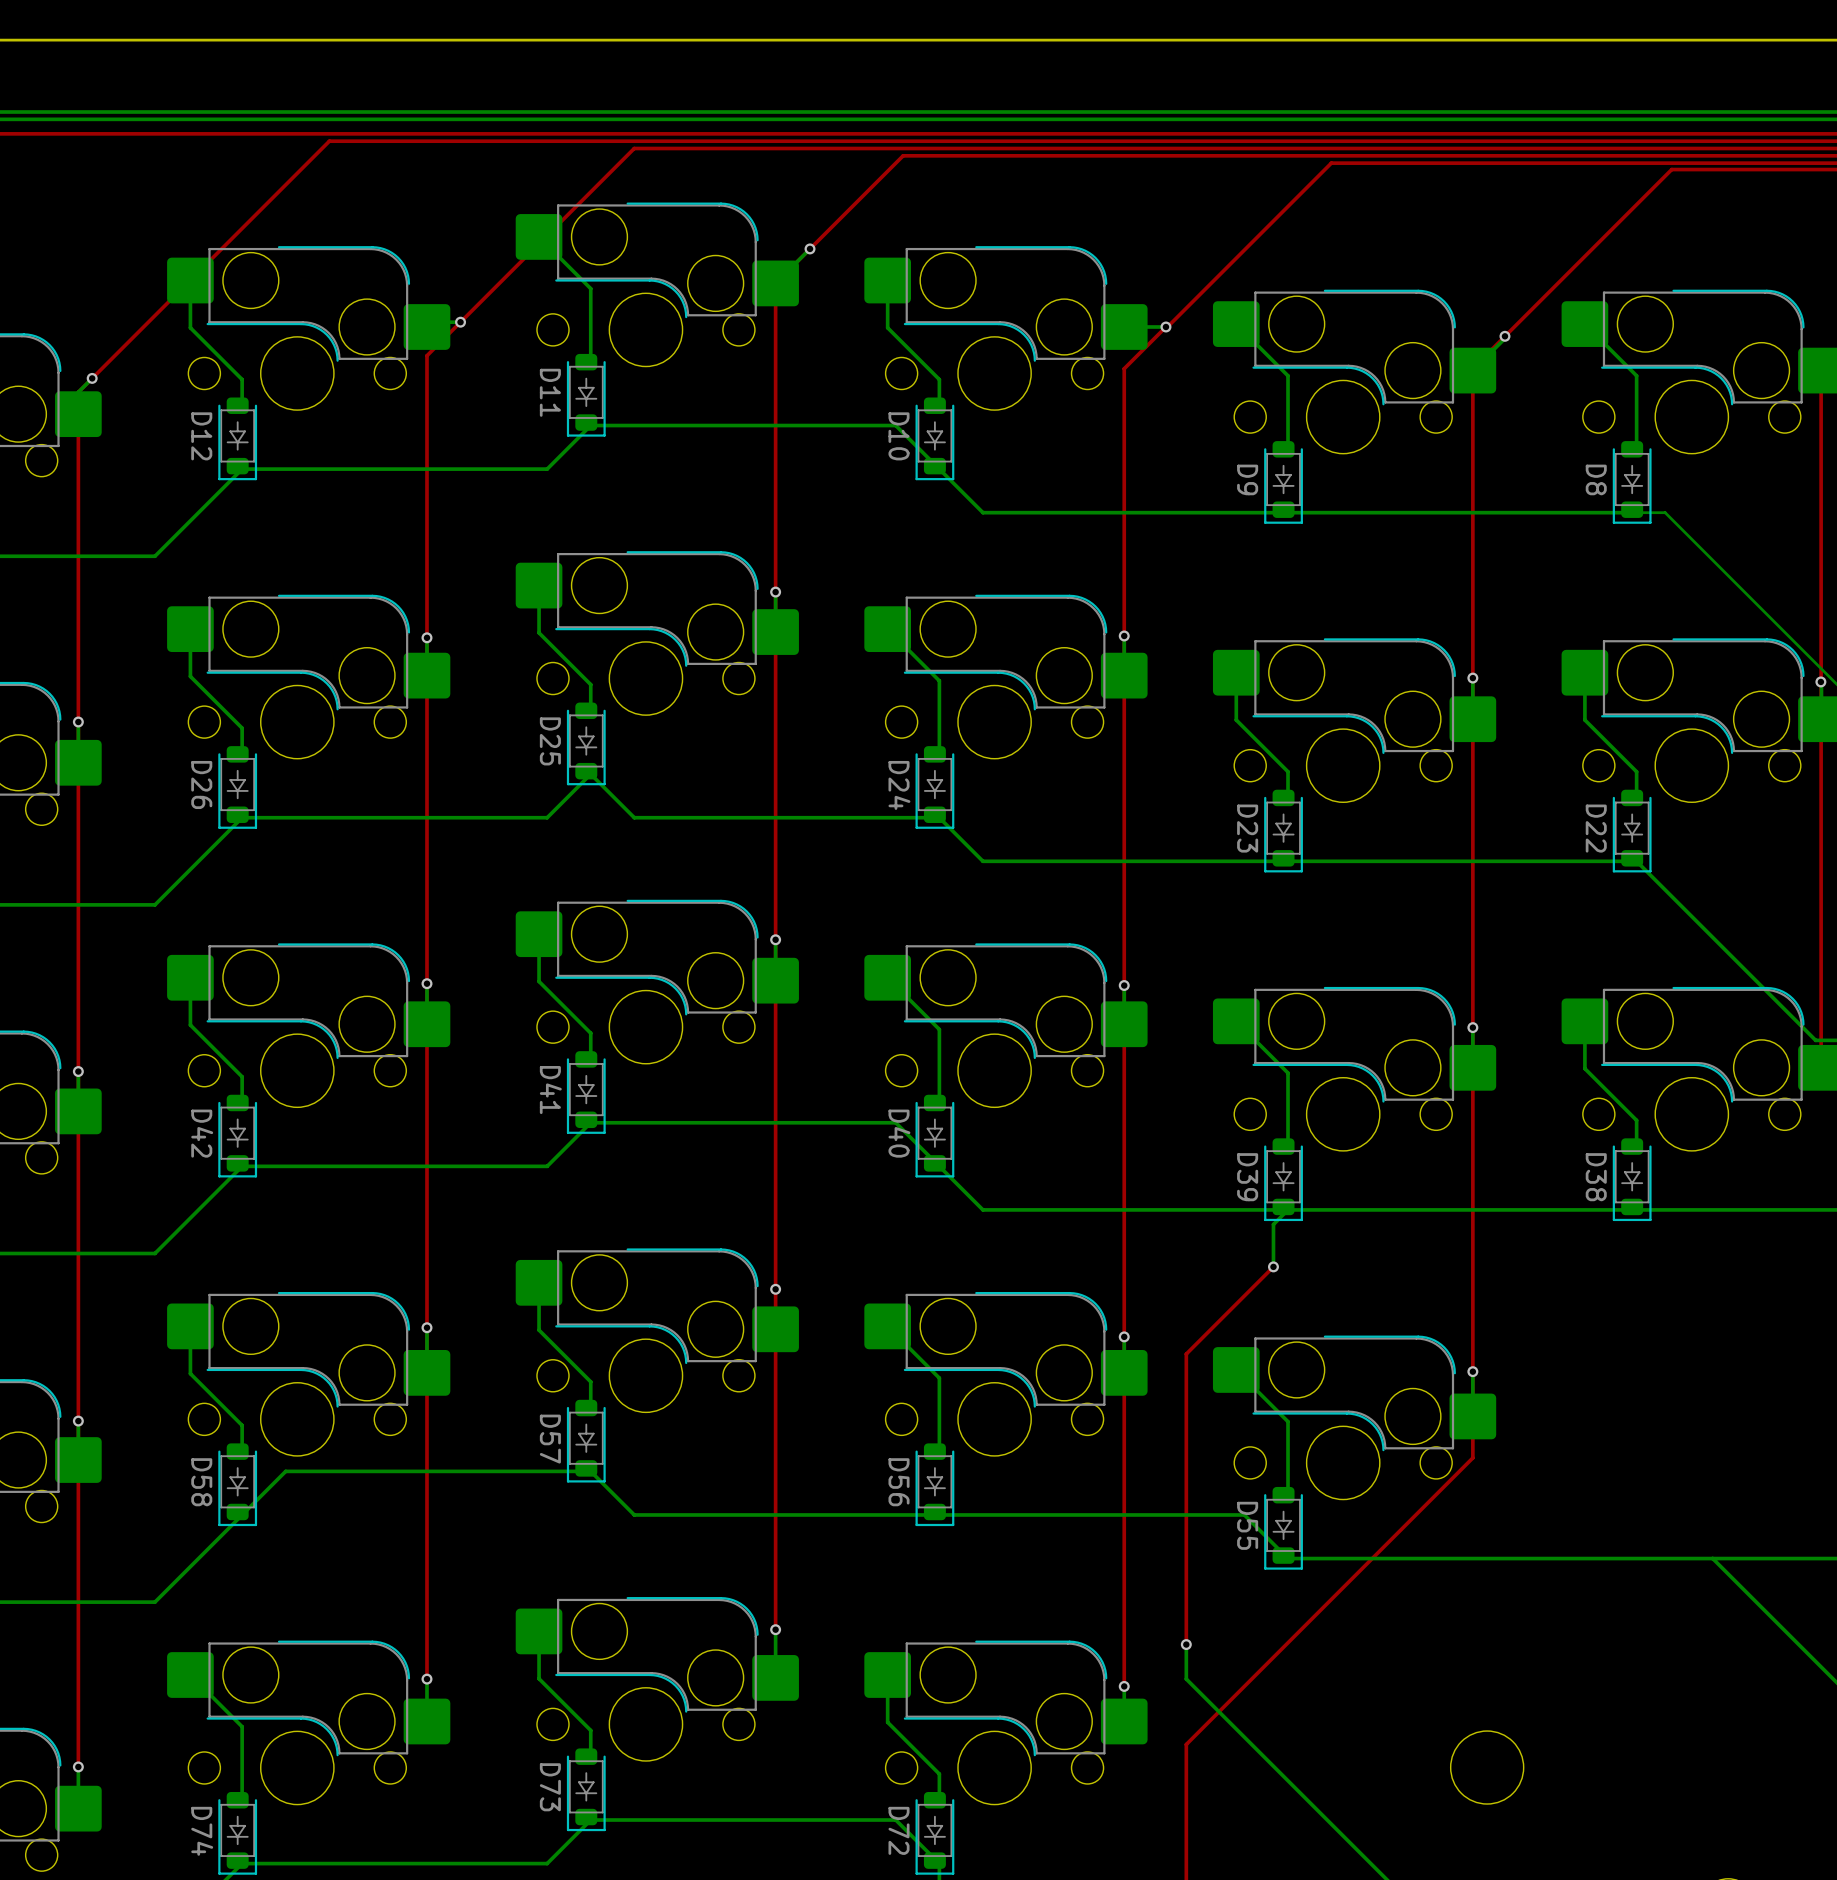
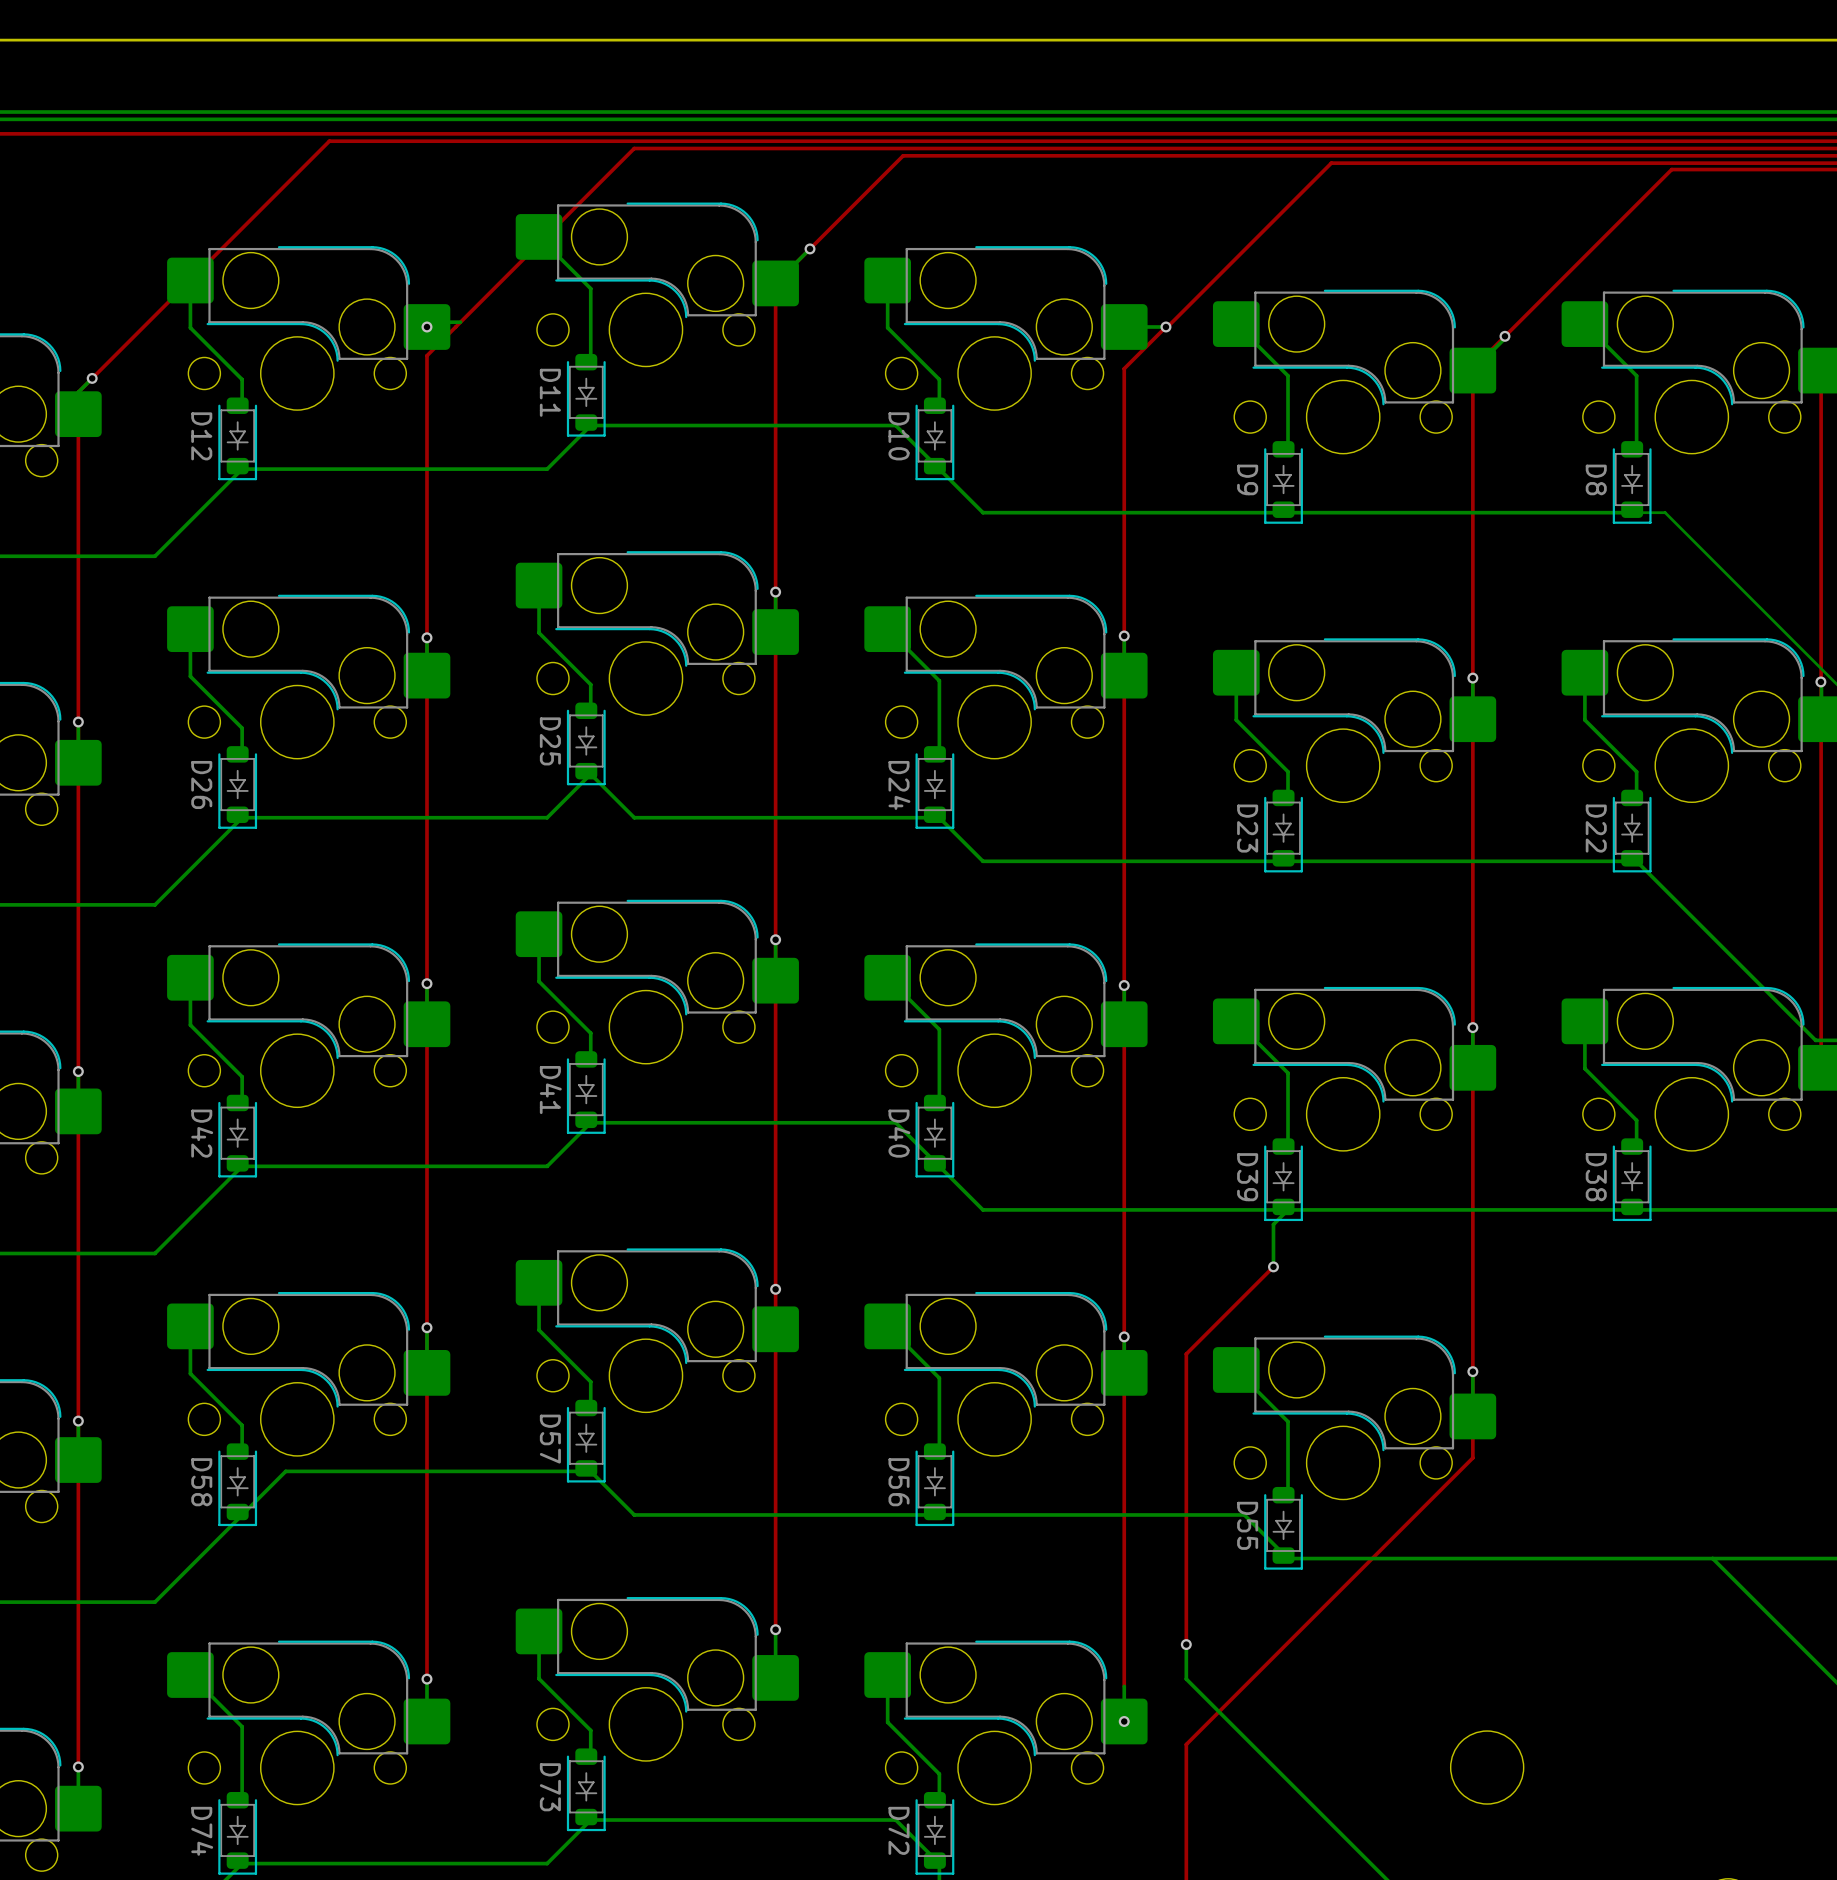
via position: (460, 322) -> (426, 327)
via position: (1124, 1686) -> (1124, 1721)

